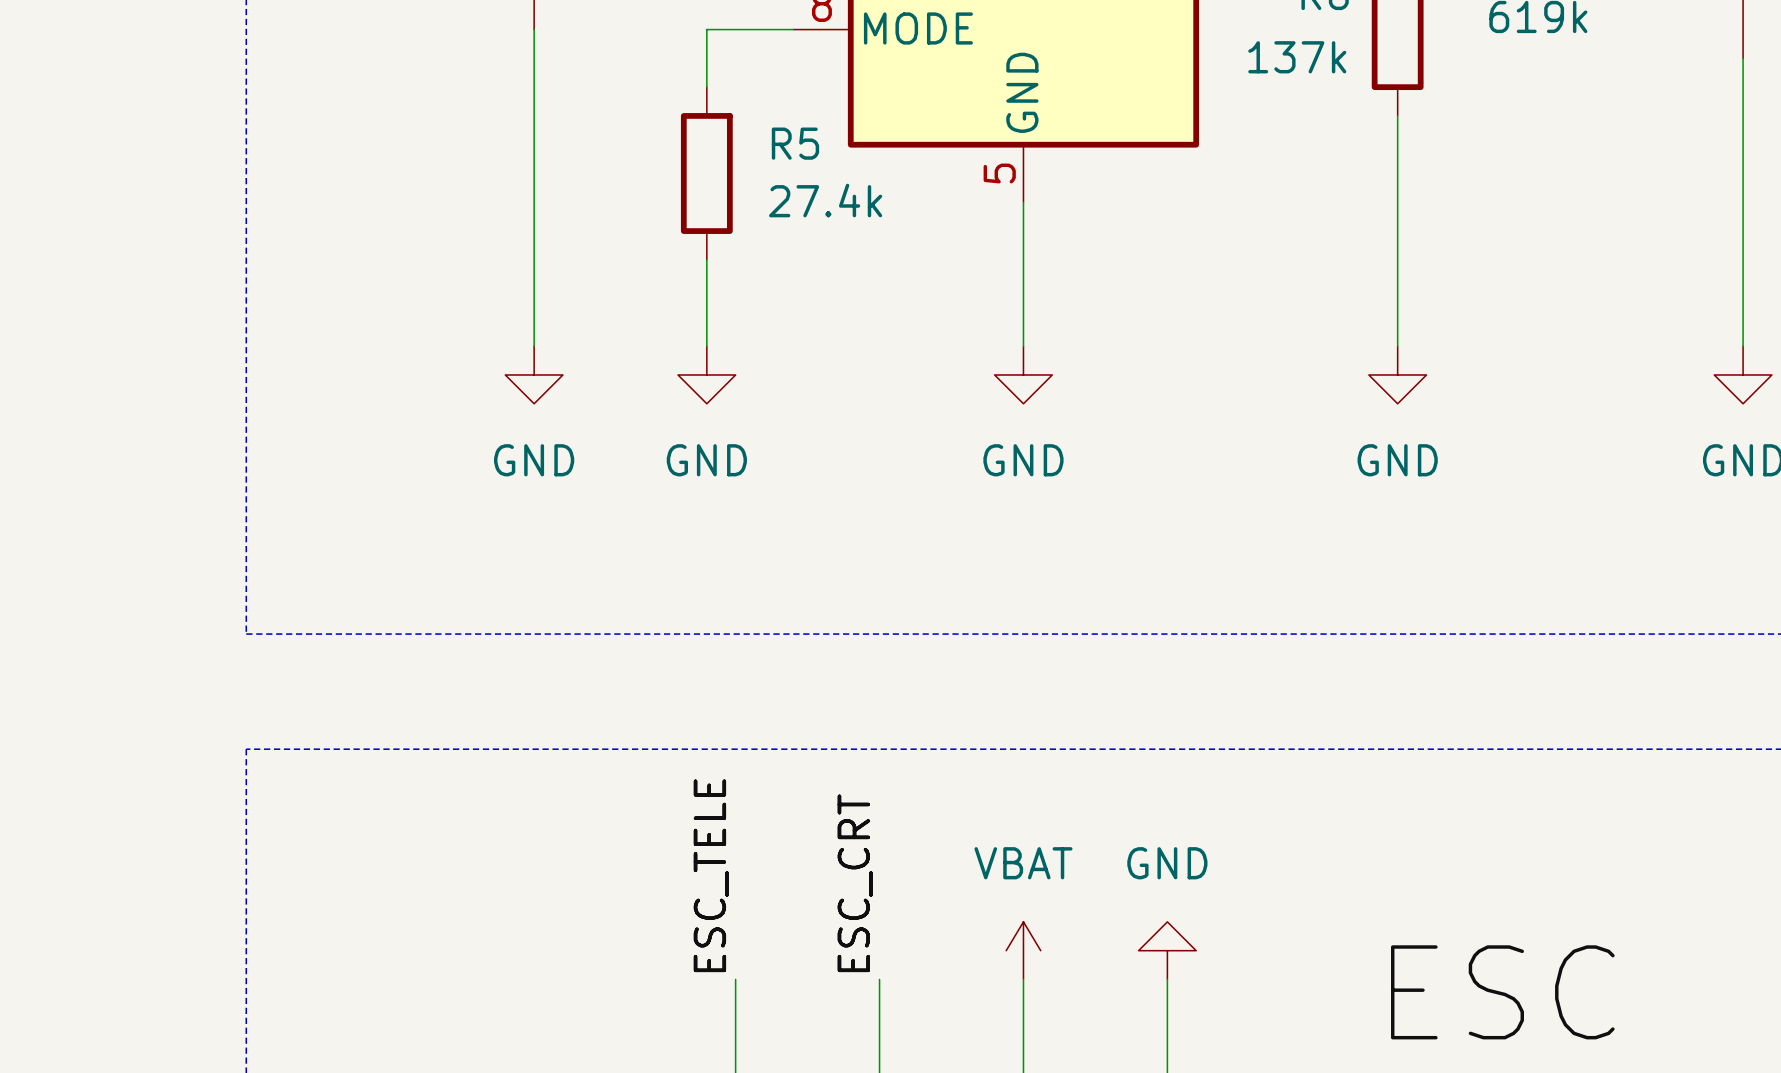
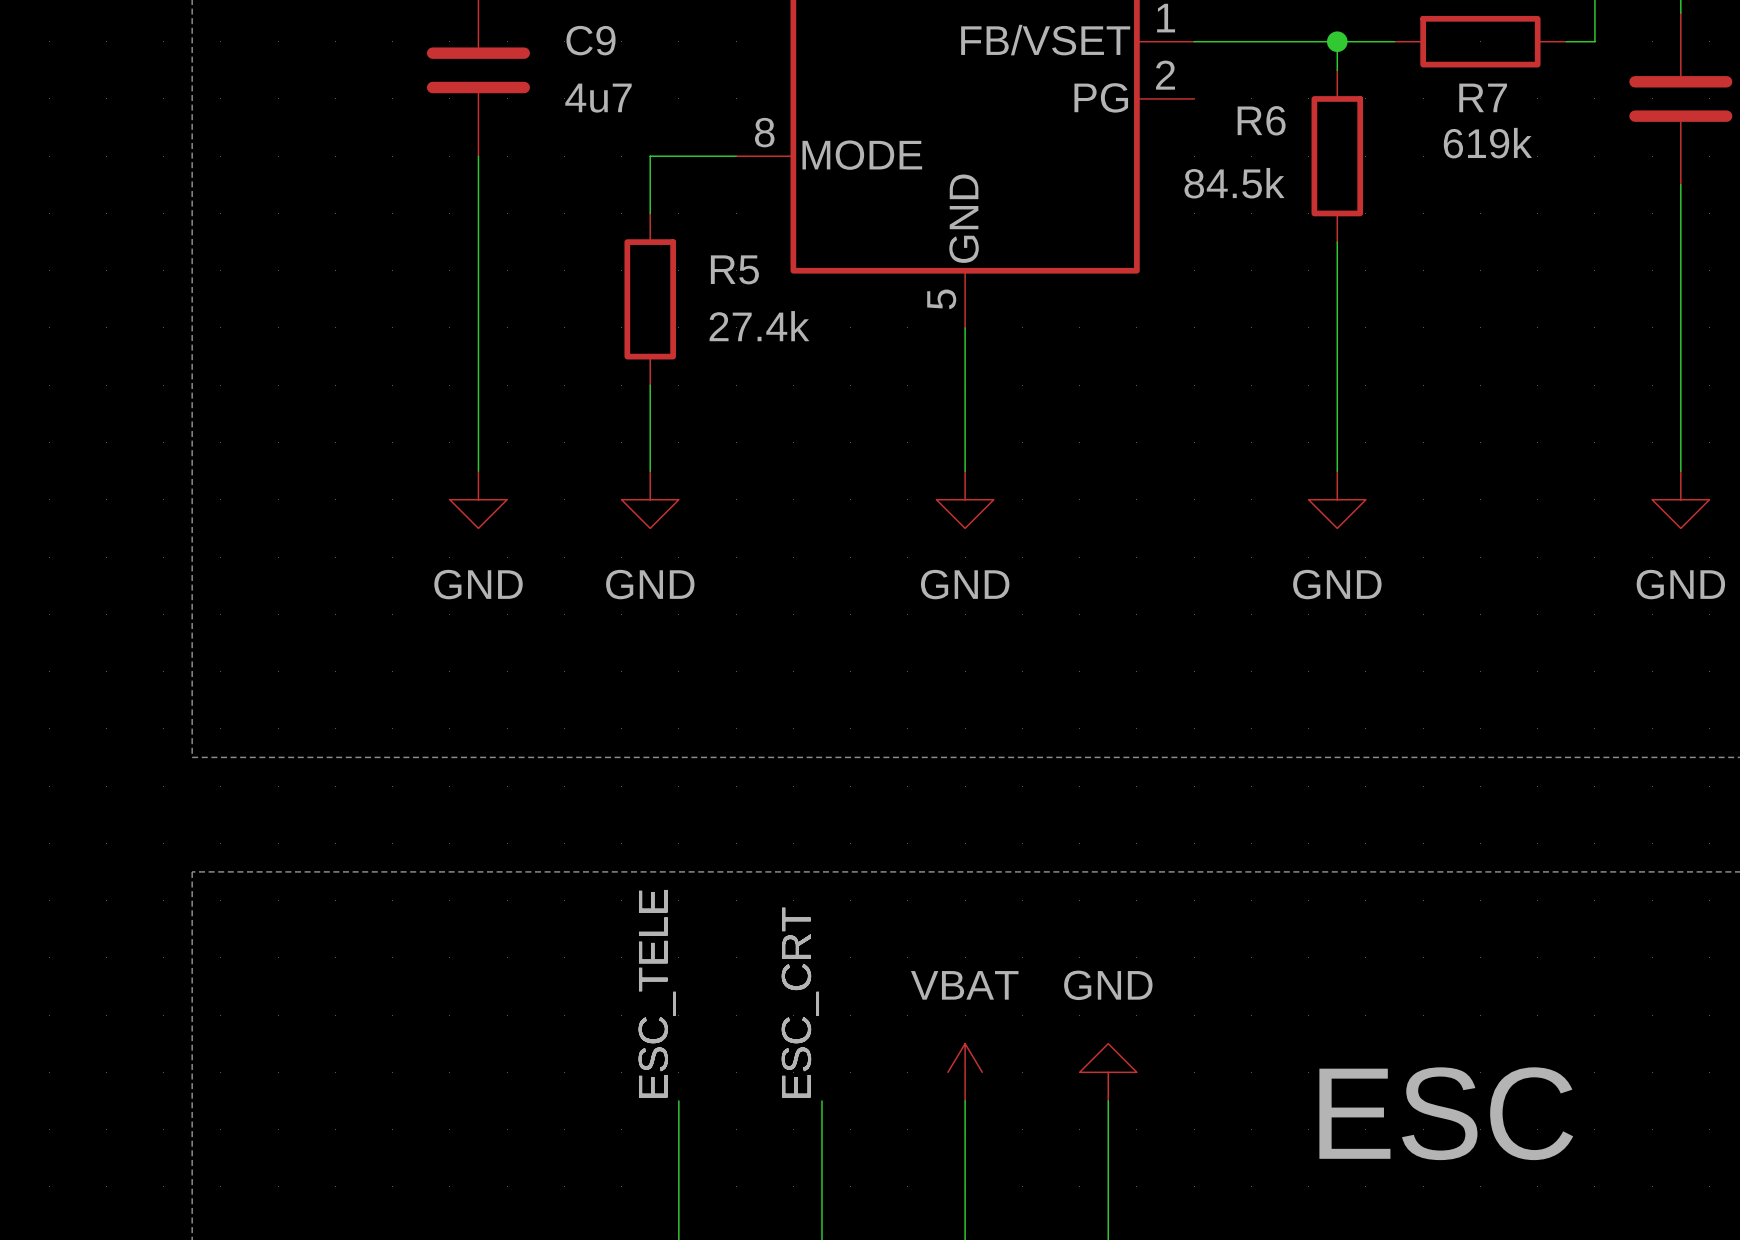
R6 value: 137k (1297, 57) -> 84.5k (1234, 183)

